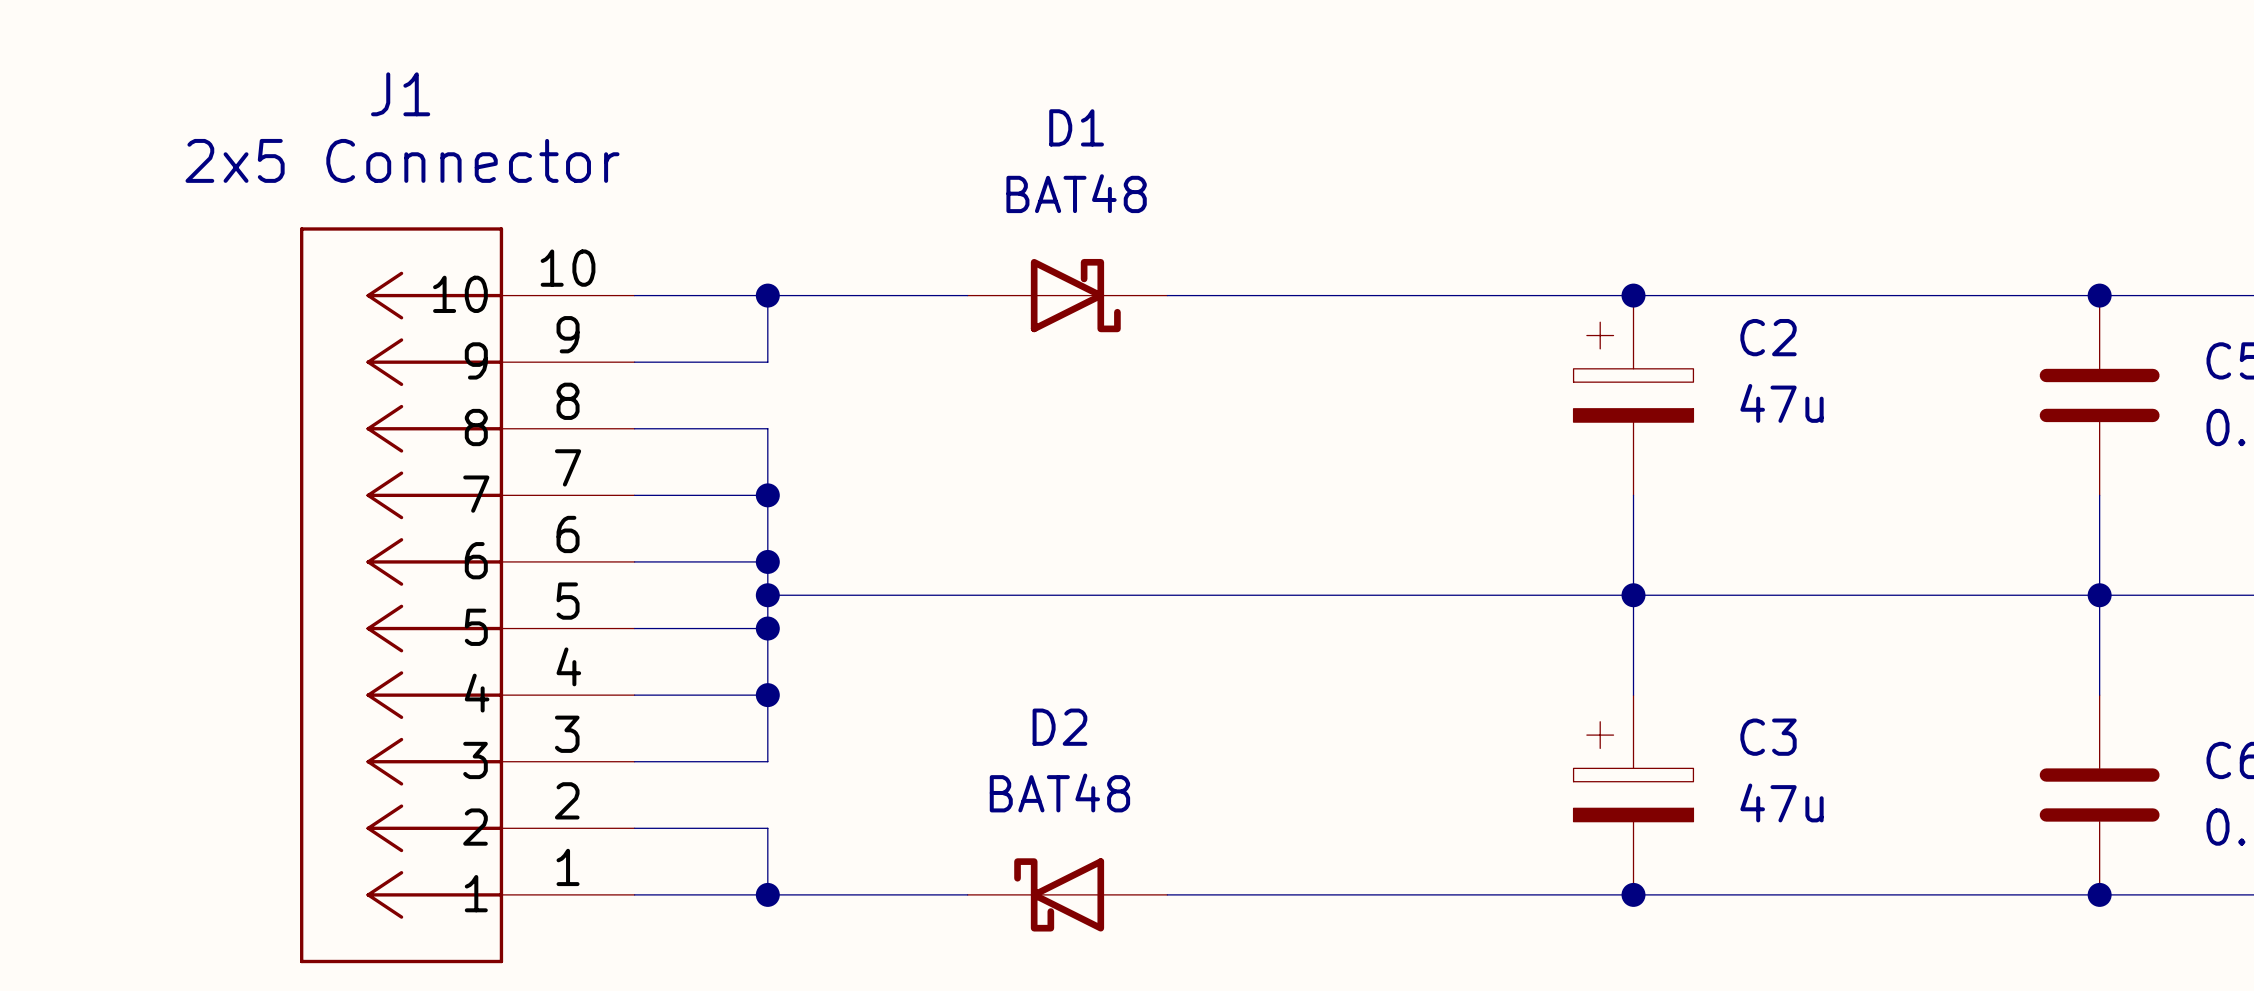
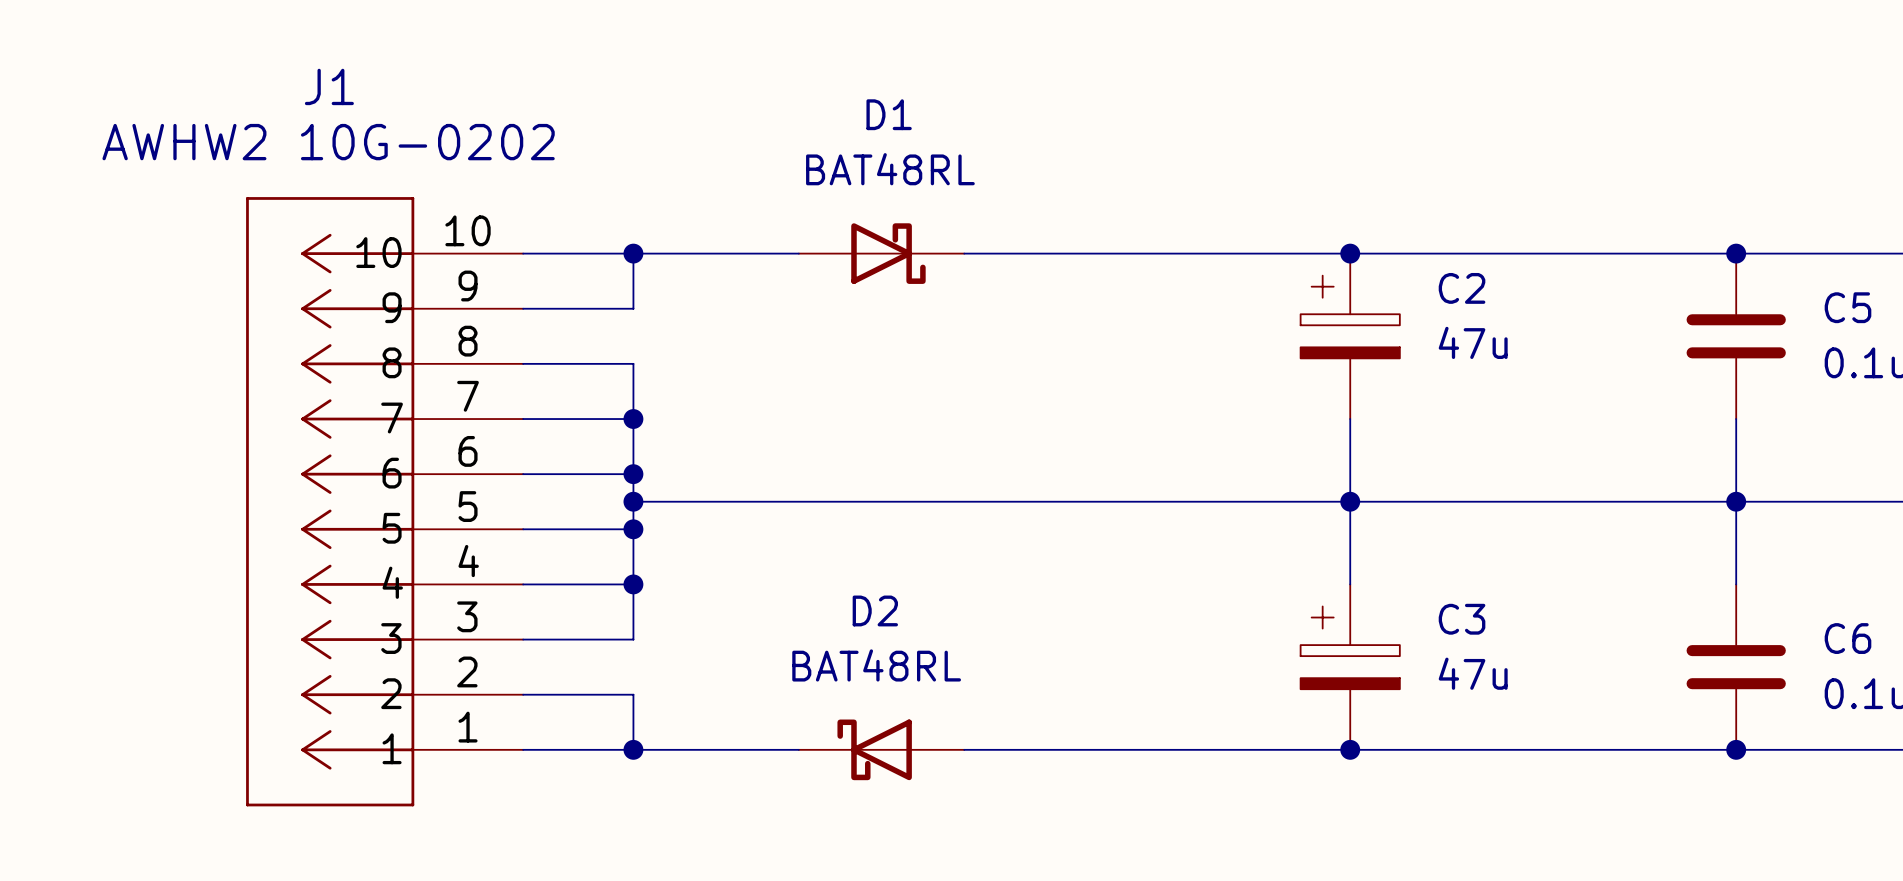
J1 value: 2x5 Connector (402, 160) -> AWHW2 10G-0202 (328, 142)
D1 value: BAT48 (1076, 193) -> BAT48RL (890, 169)
D2 value: BAT48 (1059, 792) -> BAT48RL (876, 665)

